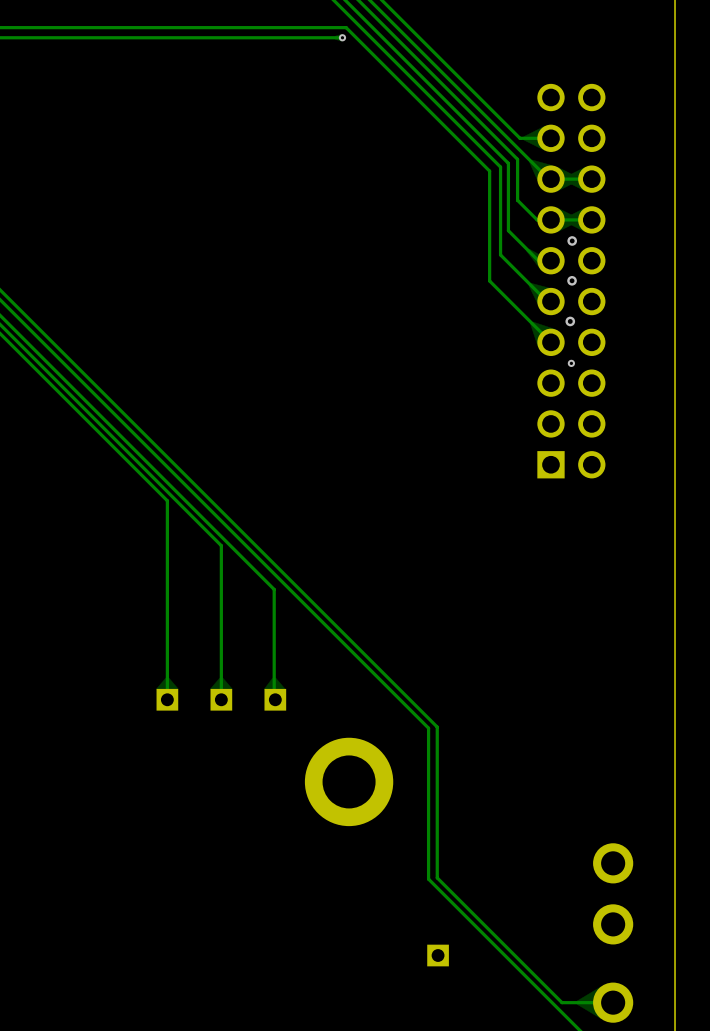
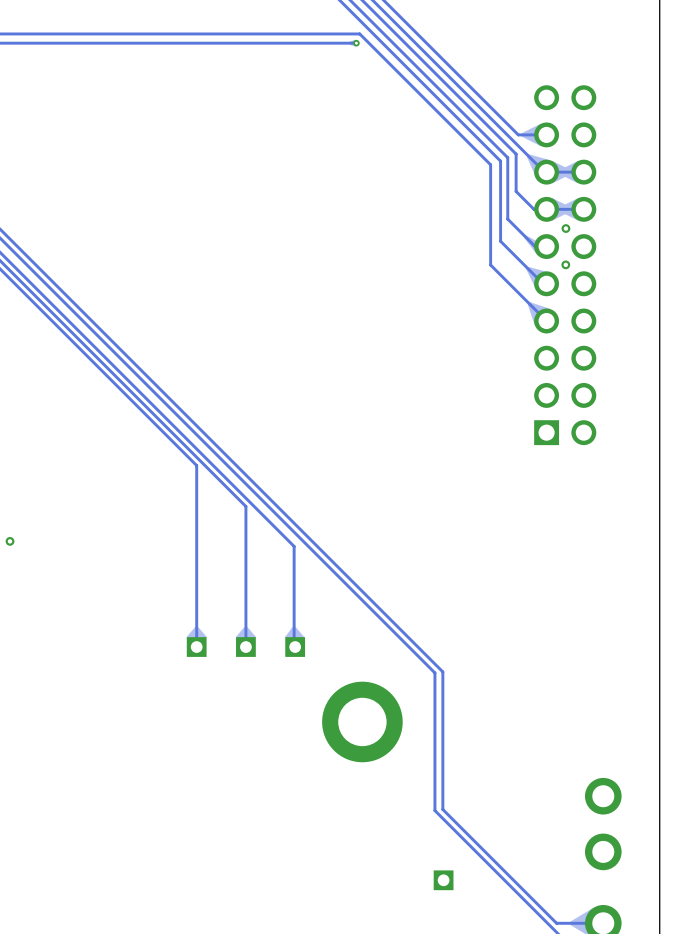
via: (570, 321) -> none
via: (571, 363) -> none

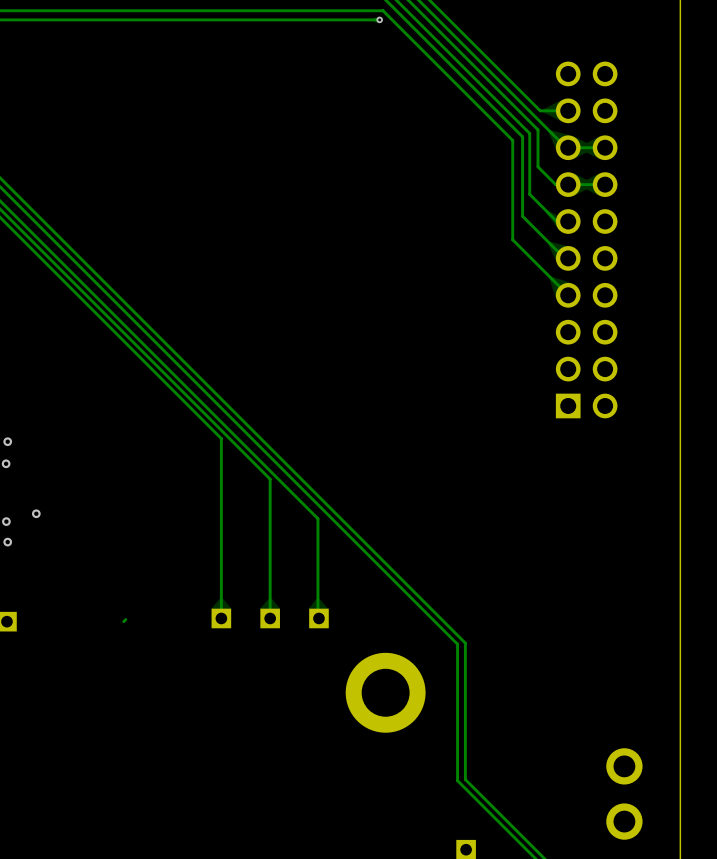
via: (565, 228) -> none
via: (565, 264) -> none
track: none -> (125, 619) (123, 621)

